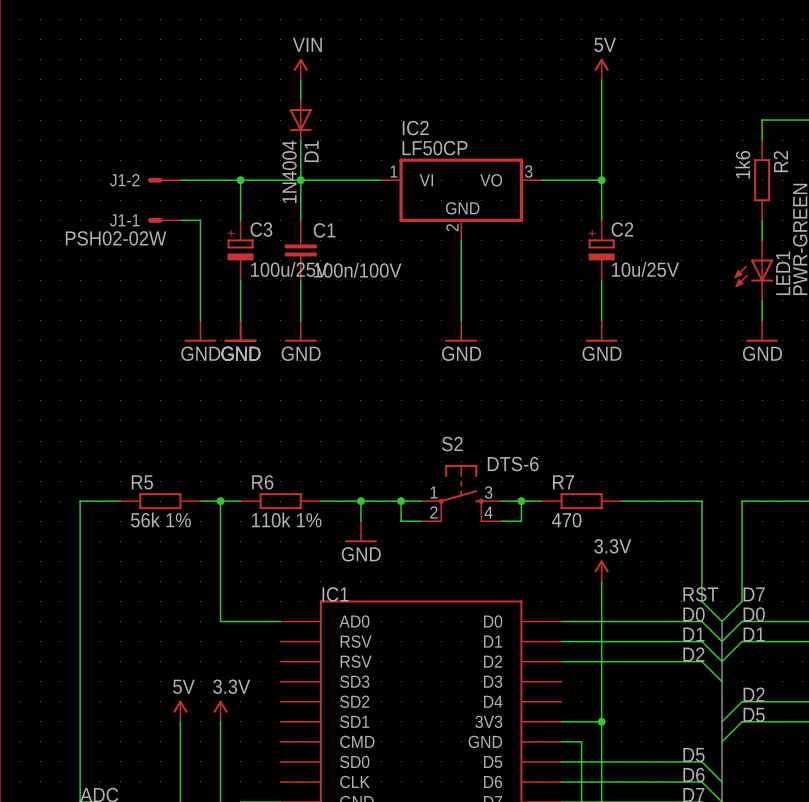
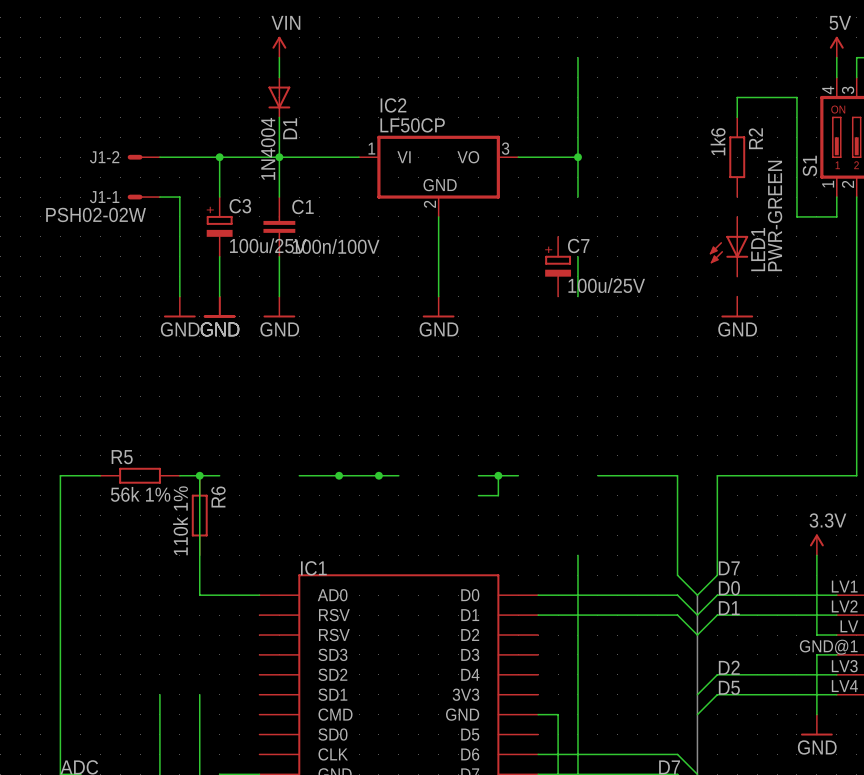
power symbol: 5V (601, 69) -> none
wire: (762, 220) (762, 240) -> none
C2: 10u/25V (601, 250) -> none
C7: none -> 100u/25V (558, 266)
wire: (762, 300) (762, 320) -> none
power symbol: GND (601, 331) -> none
S2: DTS-6 (461, 493) -> none
R6 rotation: 0° (280, 501) -> 90° clockwise (199, 515)
R6 position: (280, 501) -> (199, 515)
wire: (360, 501) (360, 521) -> none
wire: (401, 501) (401, 521) (421, 521) -> none
R7: 470 (581, 501) -> none
power symbol: GND (360, 531) -> none
power symbol: 3.3V (601, 570) -> none
label: RST (700, 594) -> none
label: D0 (694, 614) -> none
label: D1 (693, 634) -> none
label: D2 (693, 654) -> none
wire: (561, 661) (701, 661) (721, 681) -> none
power symbol: 5V (180, 711) -> none
power symbol: 3.3V (220, 711) -> none
wire: (561, 721) (601, 721) -> none
junction: (601, 721) -> none
label: D5 (693, 755) -> none
wire: (561, 761) (701, 761) (721, 781) -> none
label: D6 (693, 774) -> none

